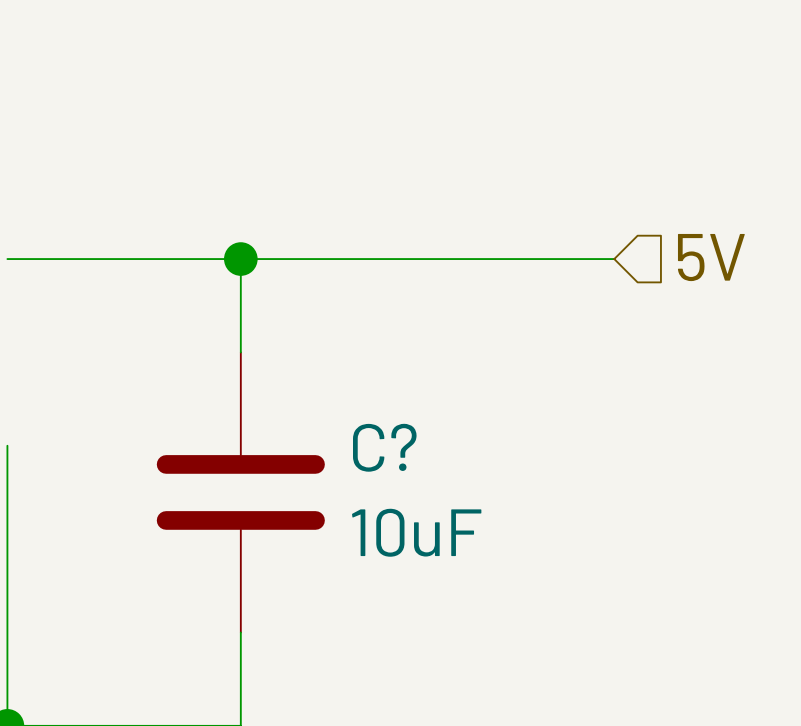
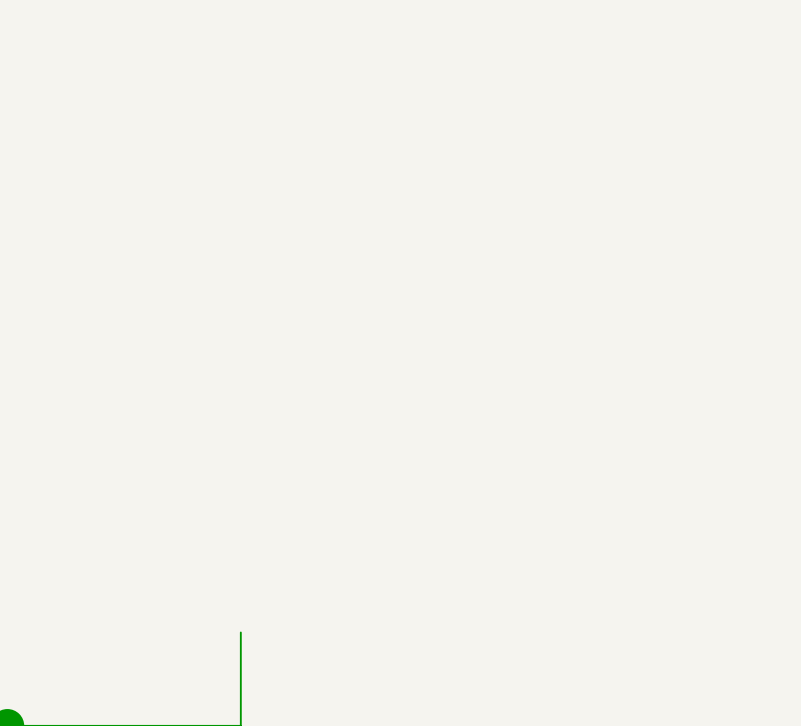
hierarchical label: 5V (711, 257) -> none
wire: (7, 259) (614, 259) -> none
wire: (240, 259) (240, 352) -> none
junction: (240, 259) -> none
wire: (7, 445) (7, 725) -> none
C?: 10uF (240, 492) -> none

